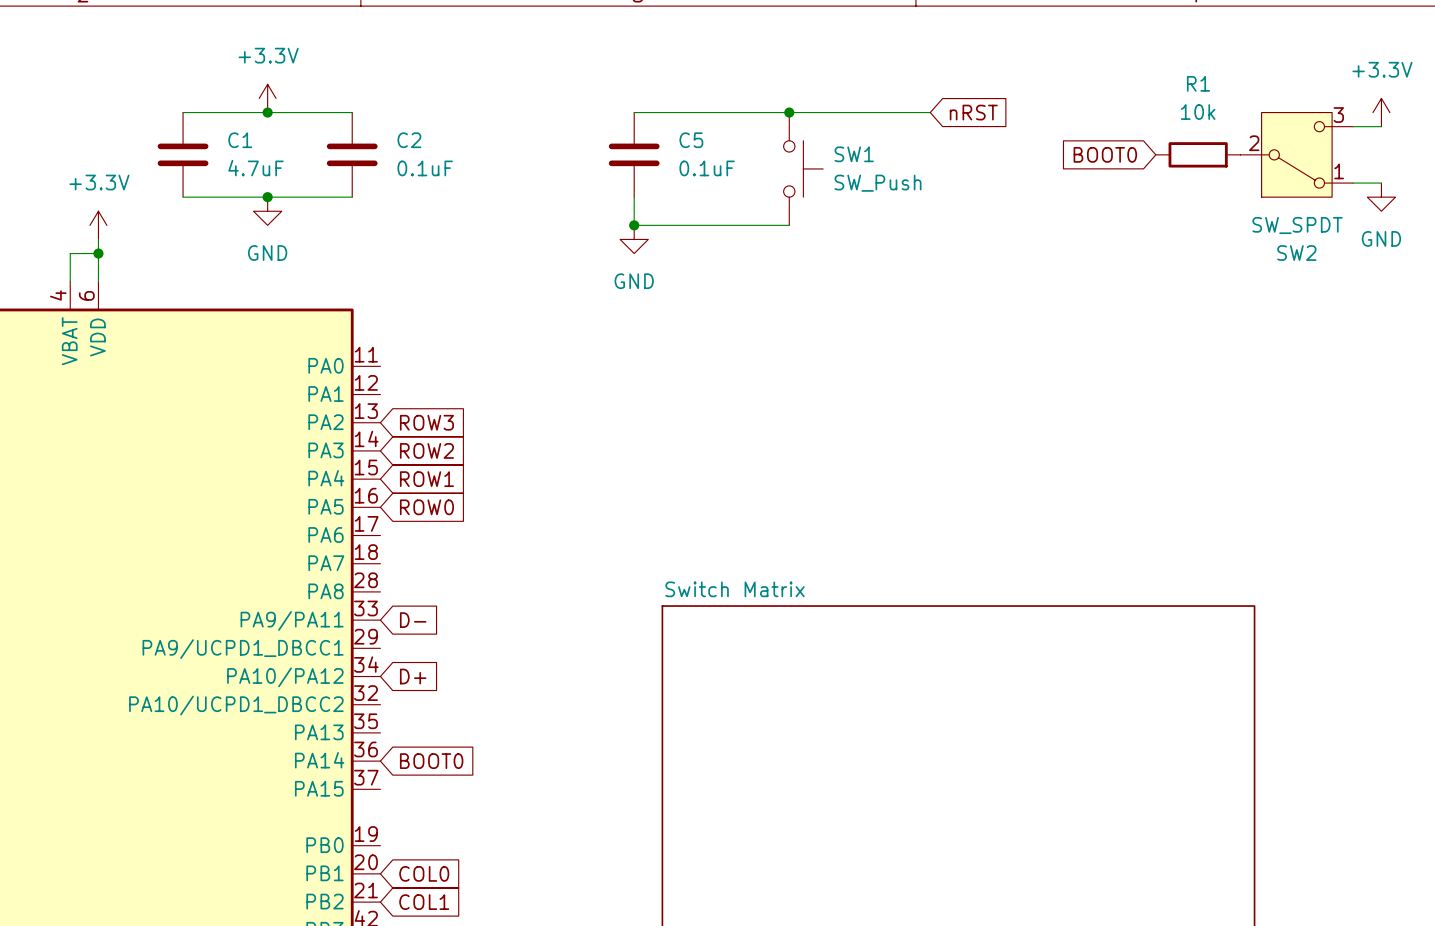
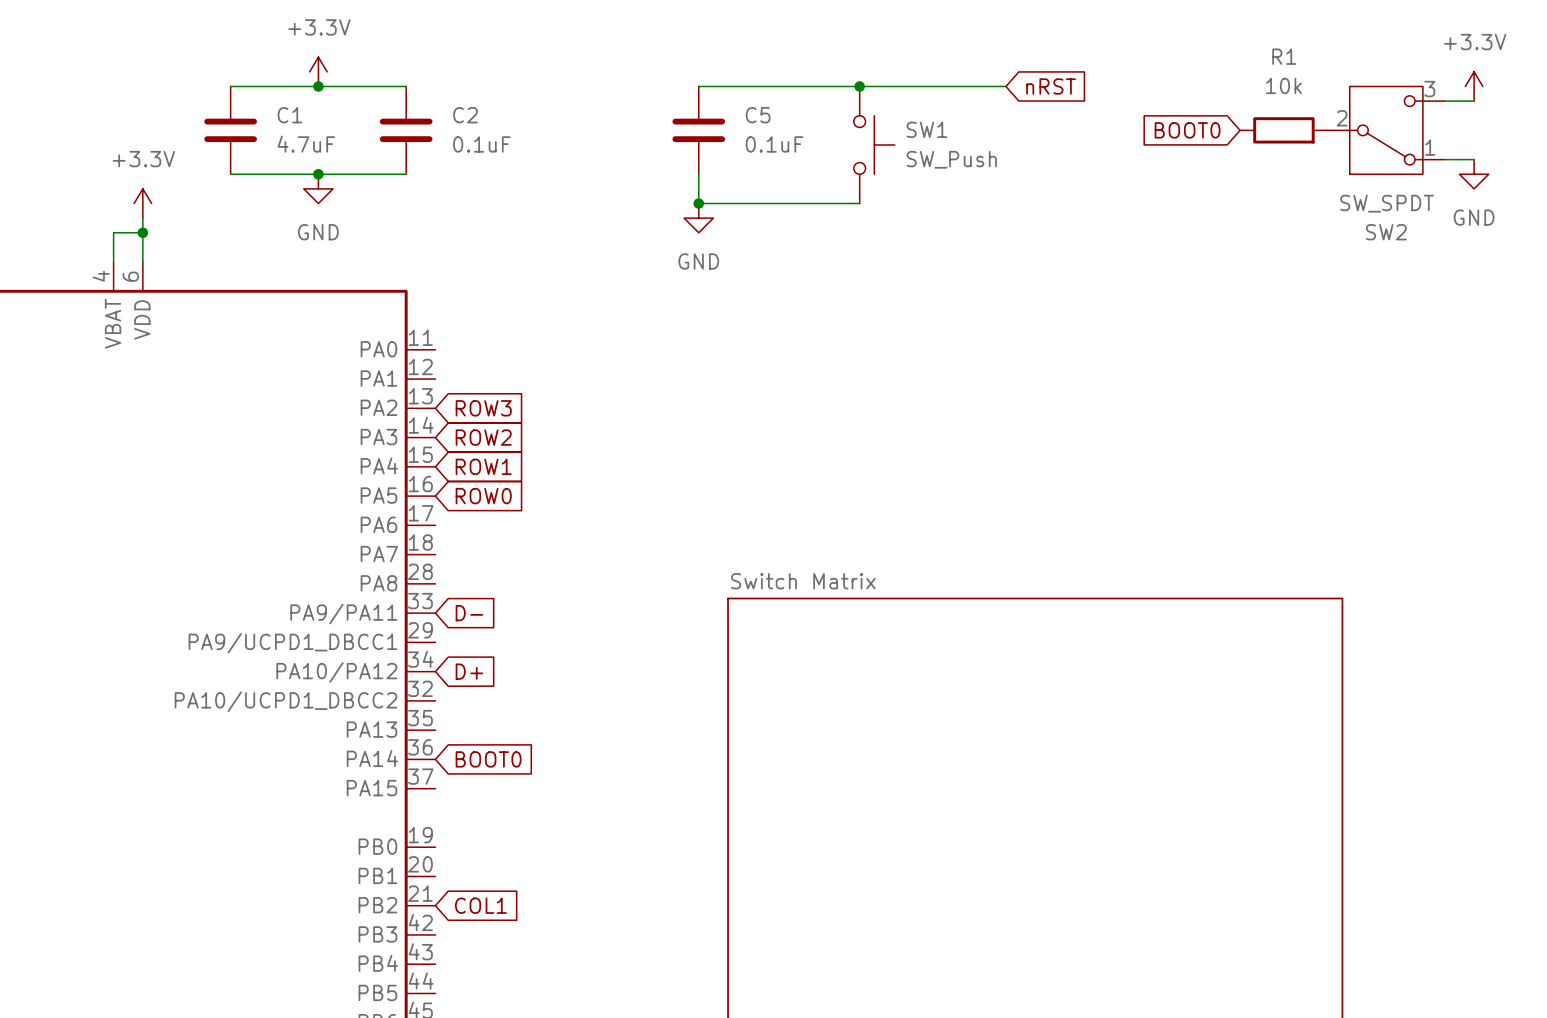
global label: COL0 (424, 873) -> none

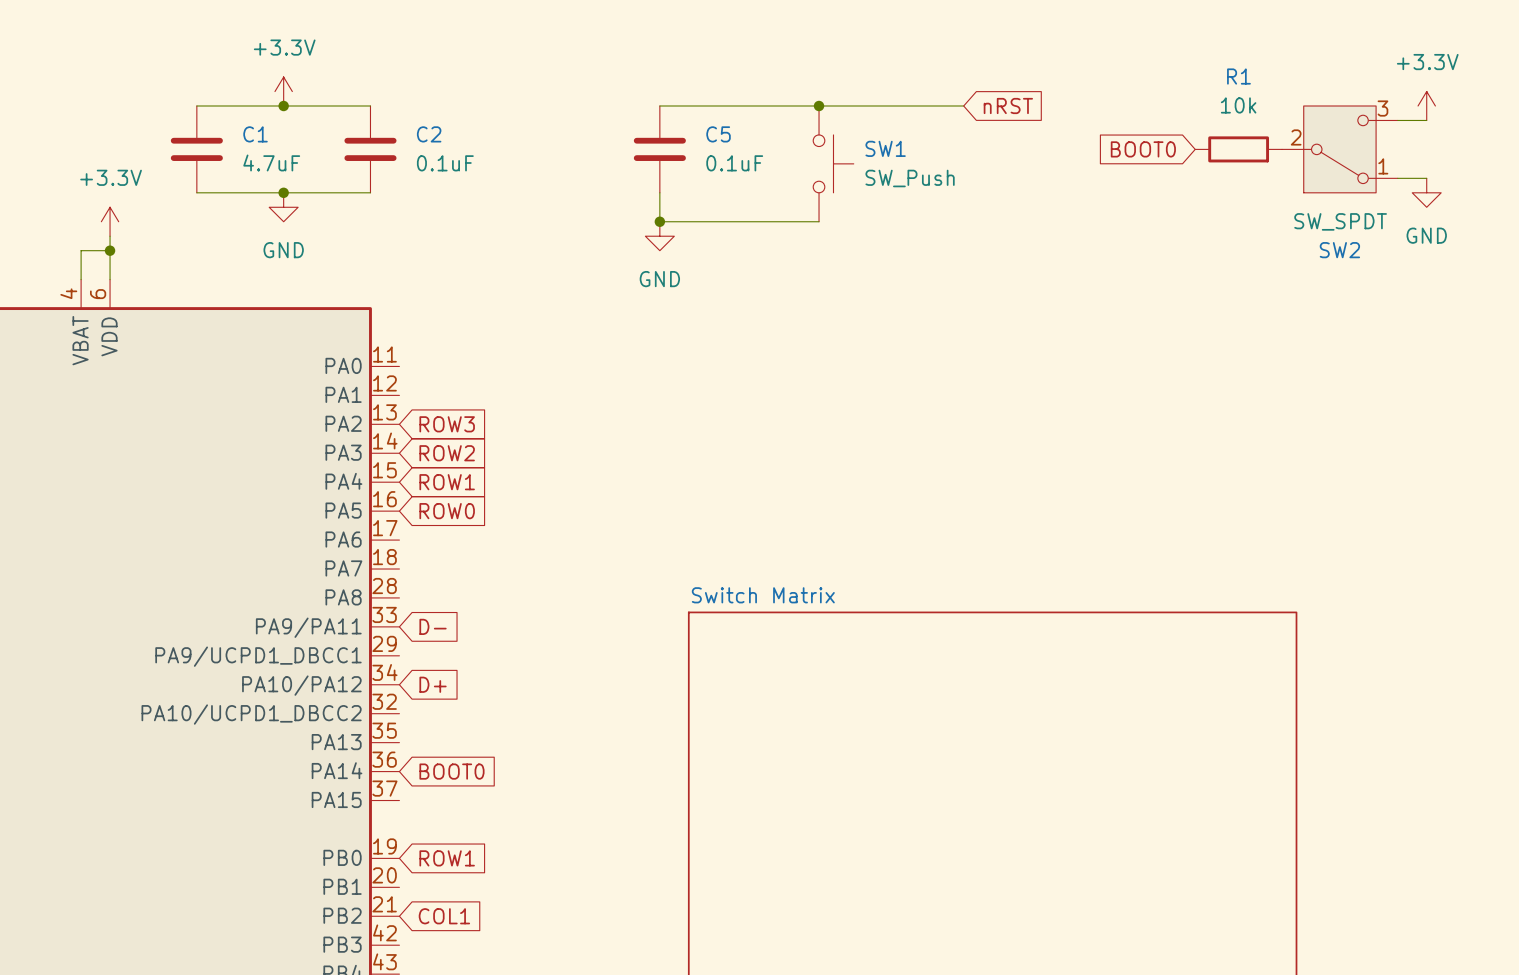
global label: none -> ROW1 (447, 858)

